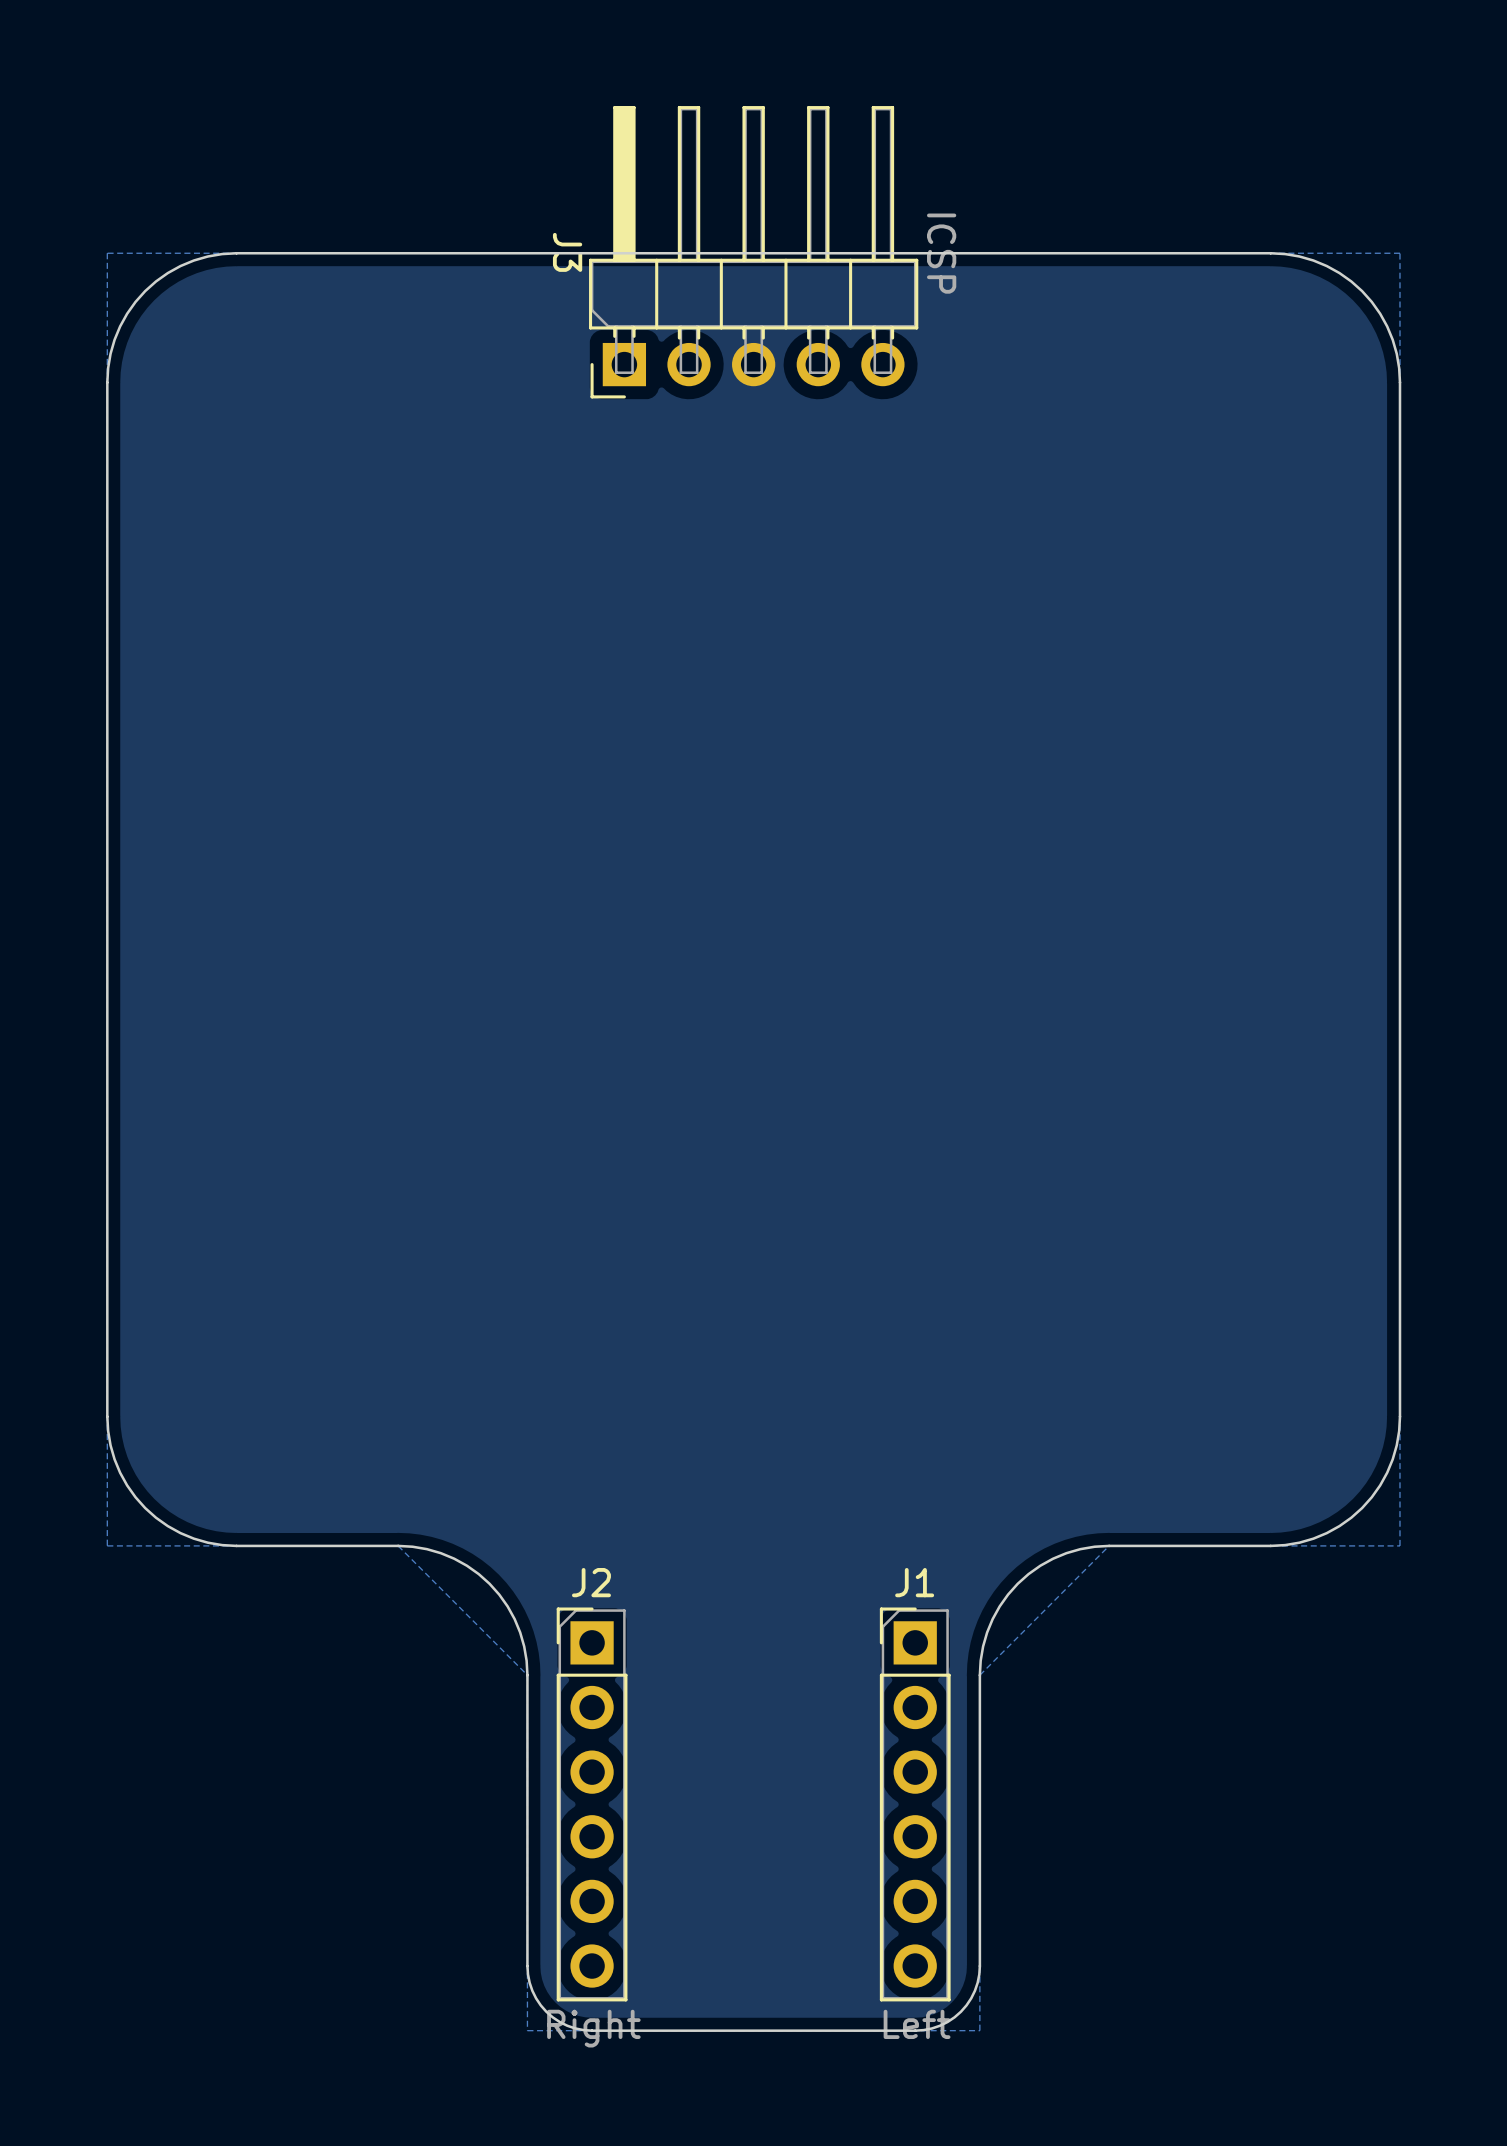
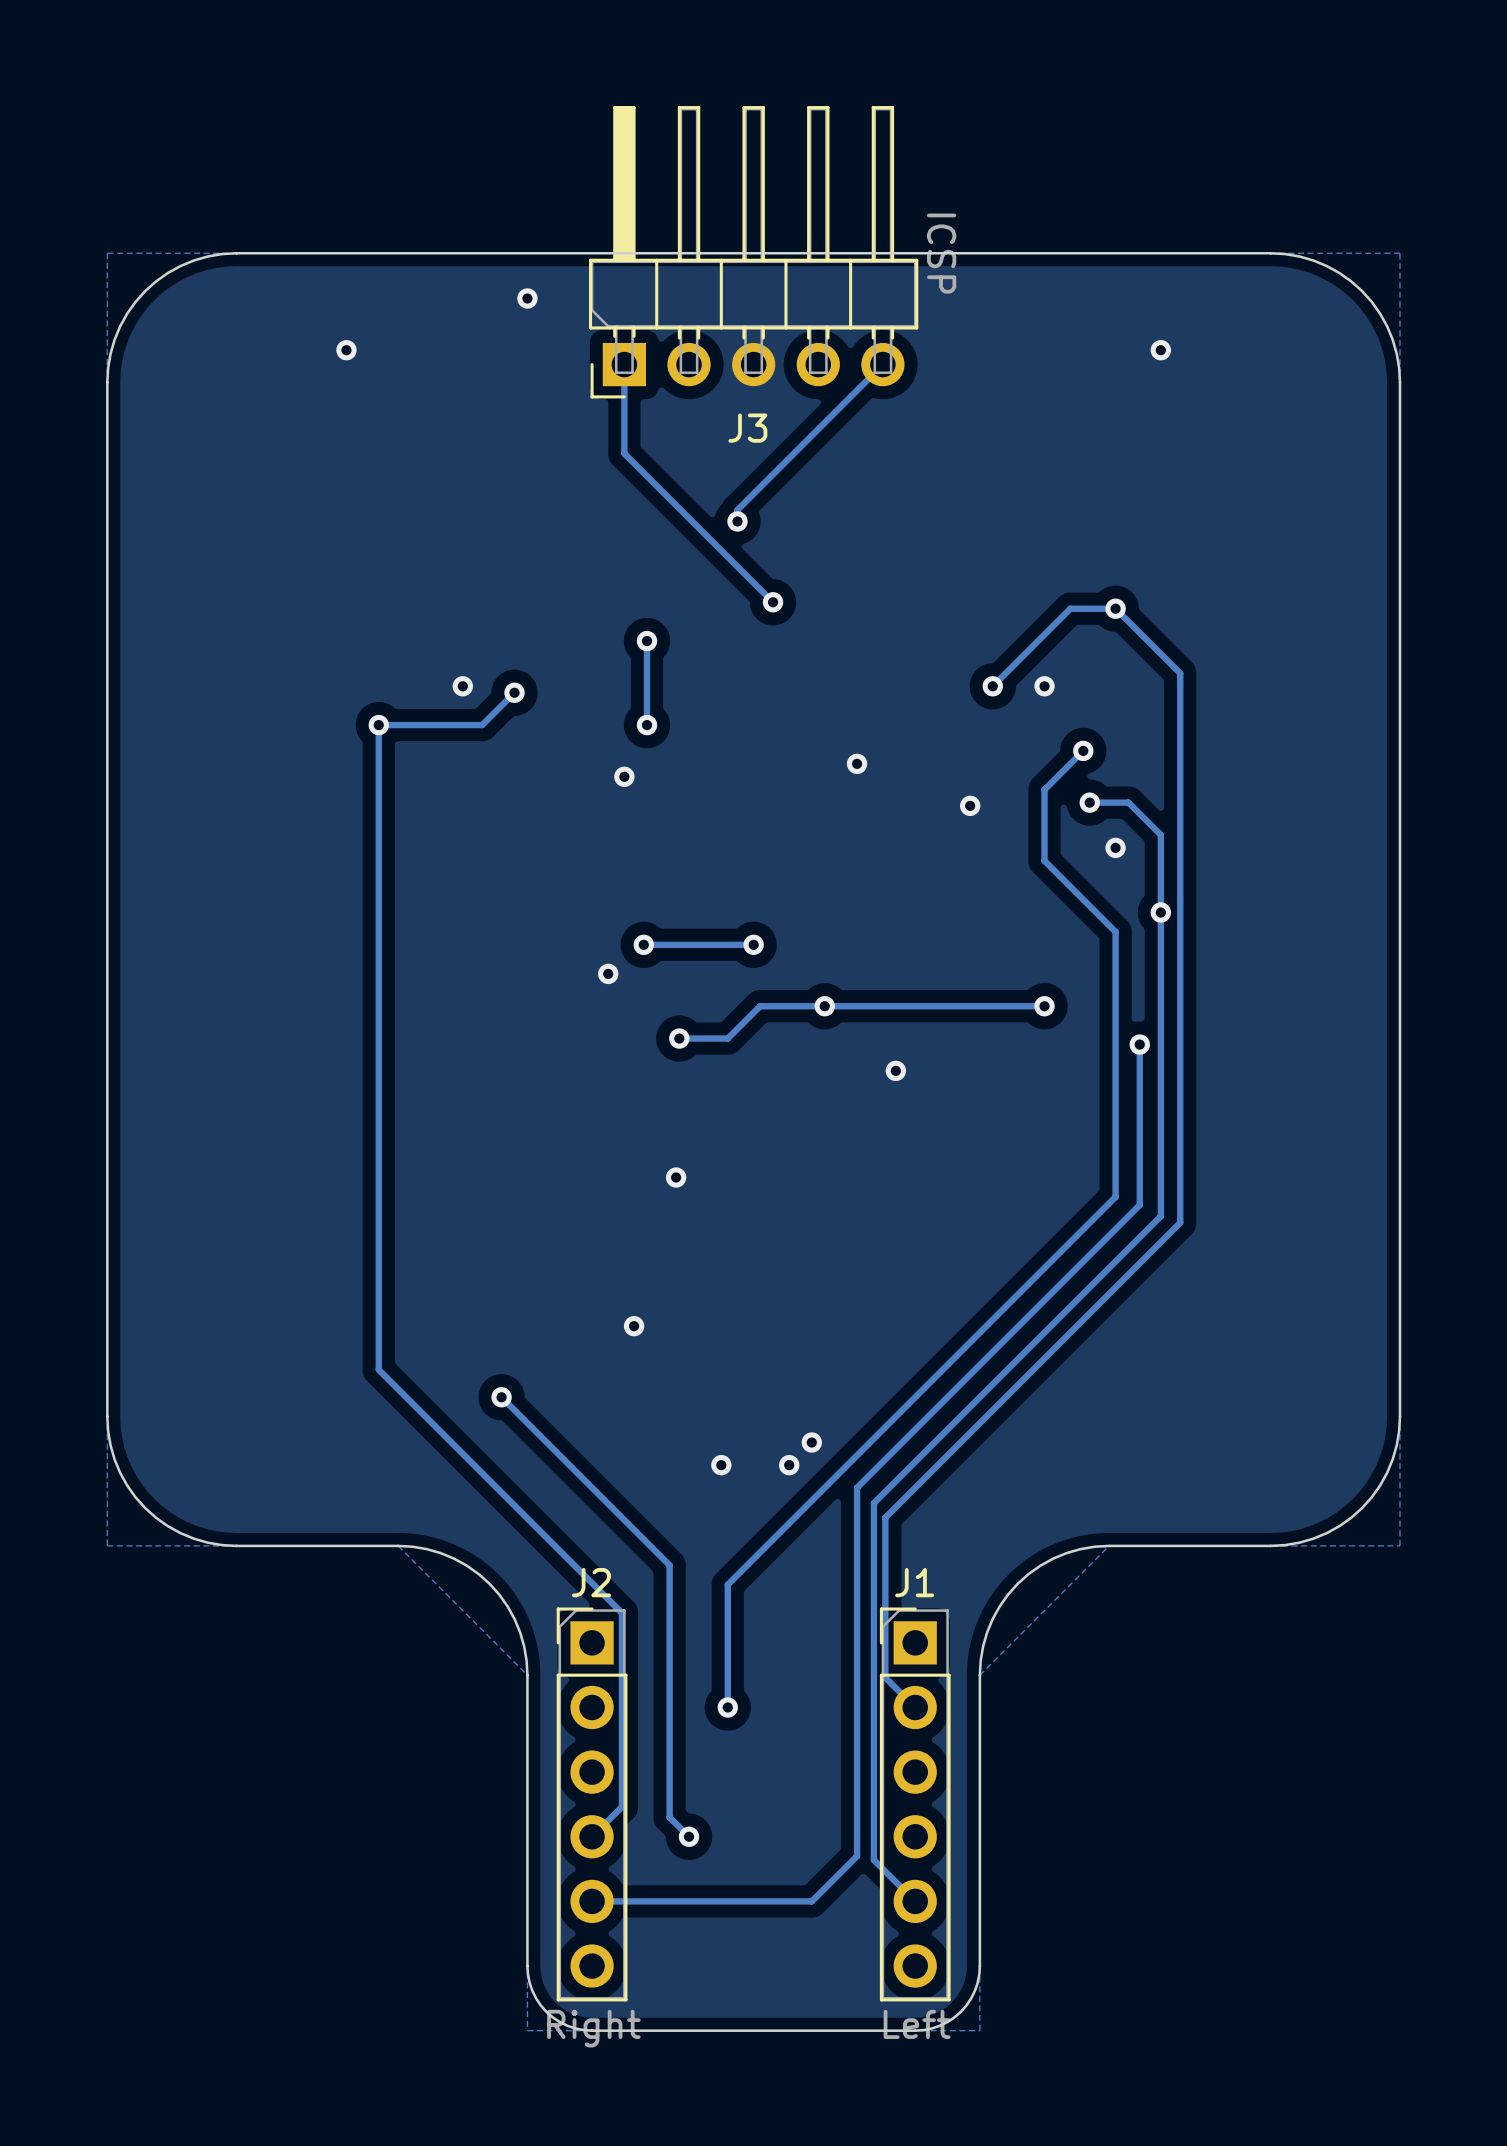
J3 name rotation: 0° (567, 252) -> 90° counterclockwise (747, 428)
J3 name position: J3 (567, 252) -> J3 (747, 428)
via: none -> (527, 298)
via: none -> (346, 350)
via: none -> (1160, 350)
track: none -> (624, 364) (624, 453) (773, 602)
track: none -> (882, 364) (737, 510) (737, 521)
via: none -> (737, 521)
via: none -> (773, 602)
via: none -> (1115, 608)
track: none -> (647, 641) (647, 725)
via: none -> (647, 641)
via: none -> (462, 686)
track: none -> (992, 686) (1070, 608) (1115, 608) (1180, 673) (1180, 1222) (885, 1517) (885, 1677) (915, 1707)
via: none -> (992, 686)
via: none -> (1044, 686)
track: none -> (514, 692) (482, 725) (378, 725) (378, 1369) (621, 1612) (621, 1806) (592, 1836)
via: none -> (514, 692)
via: none -> (378, 725)
via: none -> (647, 725)
track: none -> (1083, 750) (1044, 789) (1044, 860) (1115, 931) (1115, 1196) (727, 1584) (727, 1707)
via: none -> (1083, 750)
via: none -> (857, 763)
via: none -> (624, 776)
track: none -> (1089, 802) (1128, 802) (1160, 834) (1160, 1216) (873, 1503) (873, 1860) (915, 1901)
via: none -> (1089, 802)
via: none -> (970, 805)
via: none -> (1115, 847)
via: none -> (1160, 912)
via: none -> (643, 944)
track: none -> (753, 944) (643, 944)
via: none -> (753, 944)
via: none -> (608, 973)
via: none -> (824, 1006)
track: none -> (1044, 1006) (760, 1006) (727, 1038) (679, 1038)
via: none -> (1044, 1006)
via: none -> (679, 1038)
track: none -> (1139, 1044) (1139, 1205) (857, 1487) (857, 1856) (811, 1901) (592, 1901)
via: none -> (1139, 1044)
via: none -> (895, 1070)
via: none -> (676, 1177)
via: none -> (634, 1326)
track: none -> (501, 1397) (669, 1565) (669, 1817) (689, 1836)
via: none -> (501, 1397)
via: none -> (811, 1442)
via: none -> (721, 1465)
via: none -> (789, 1465)
via: none -> (727, 1707)
via: none -> (689, 1836)

